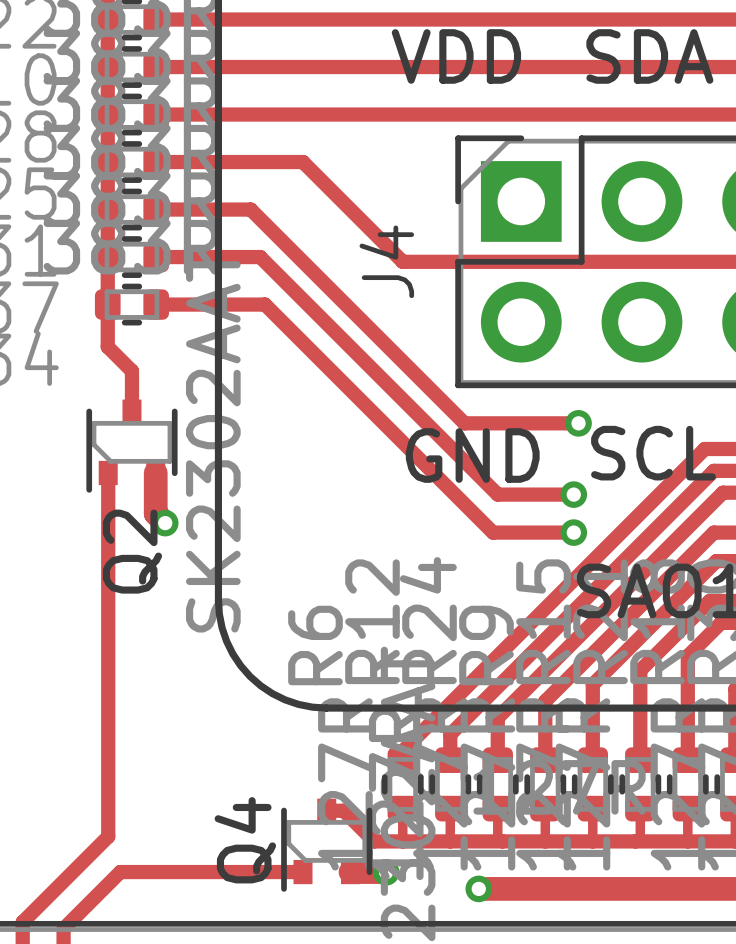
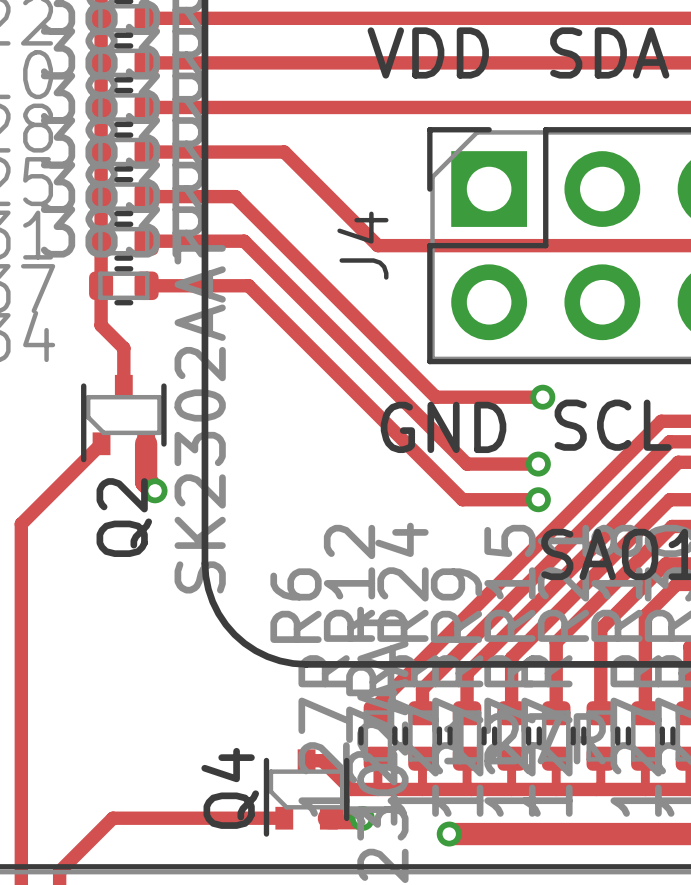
track: (108, 472) (108, 836) (22, 922) -> (101, 443) (21, 524) (21, 865)

